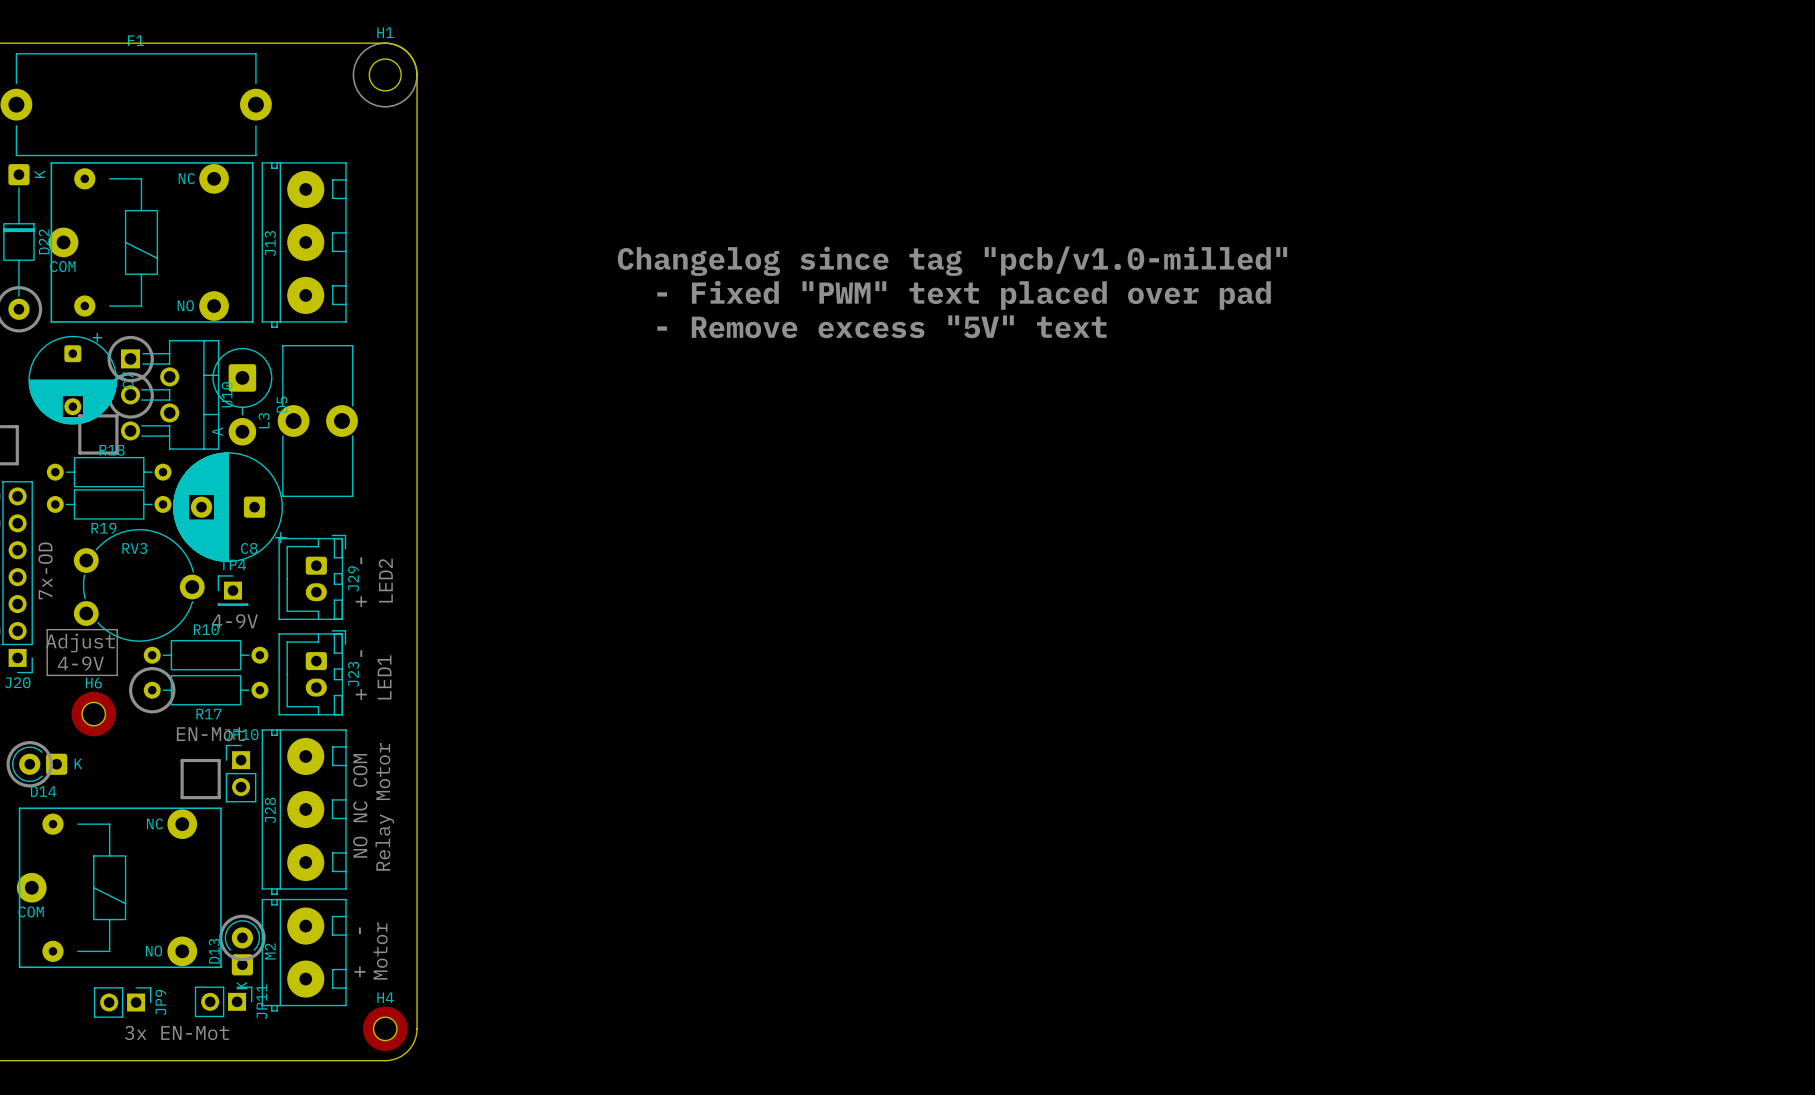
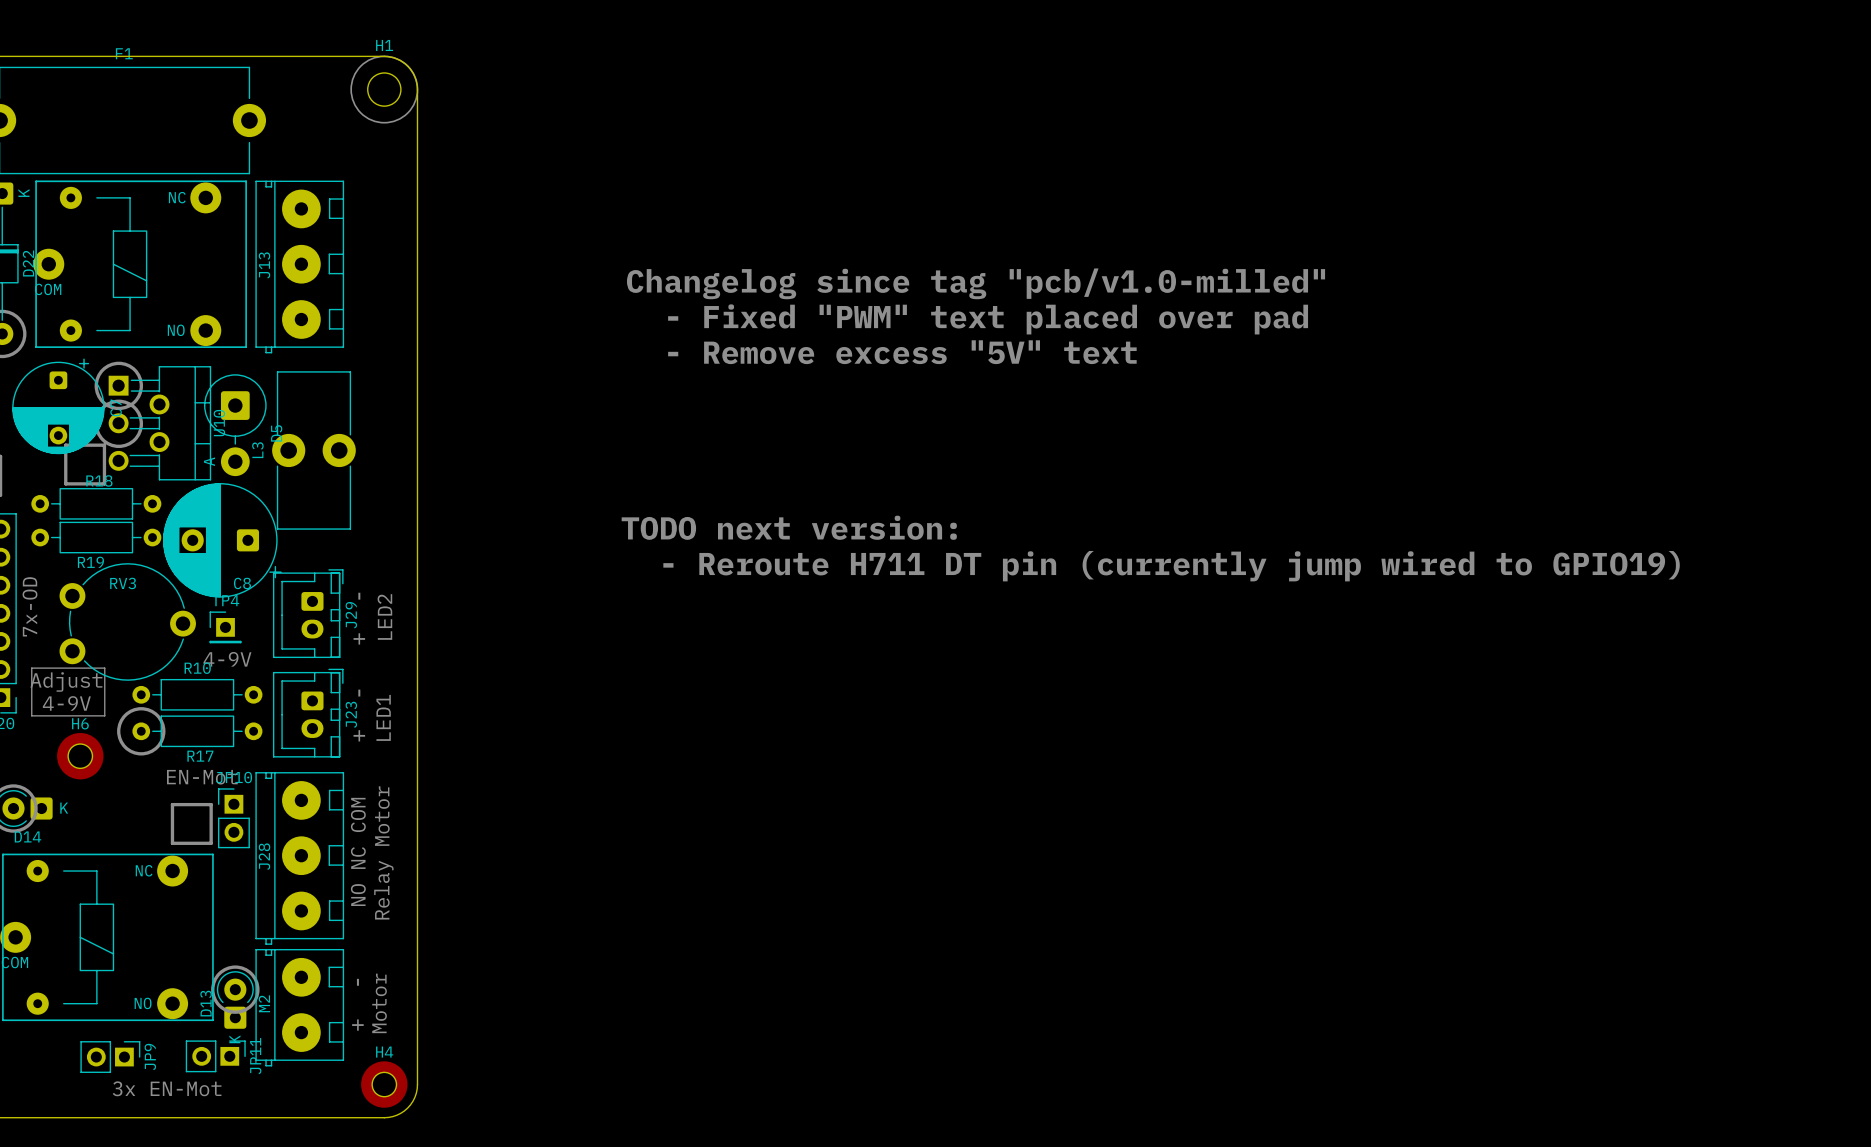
text: none -> TODO next version: (789, 527)
text: none -> - Reroute H711 DT pin (currently jump wired to GPIO19) (1171, 566)

